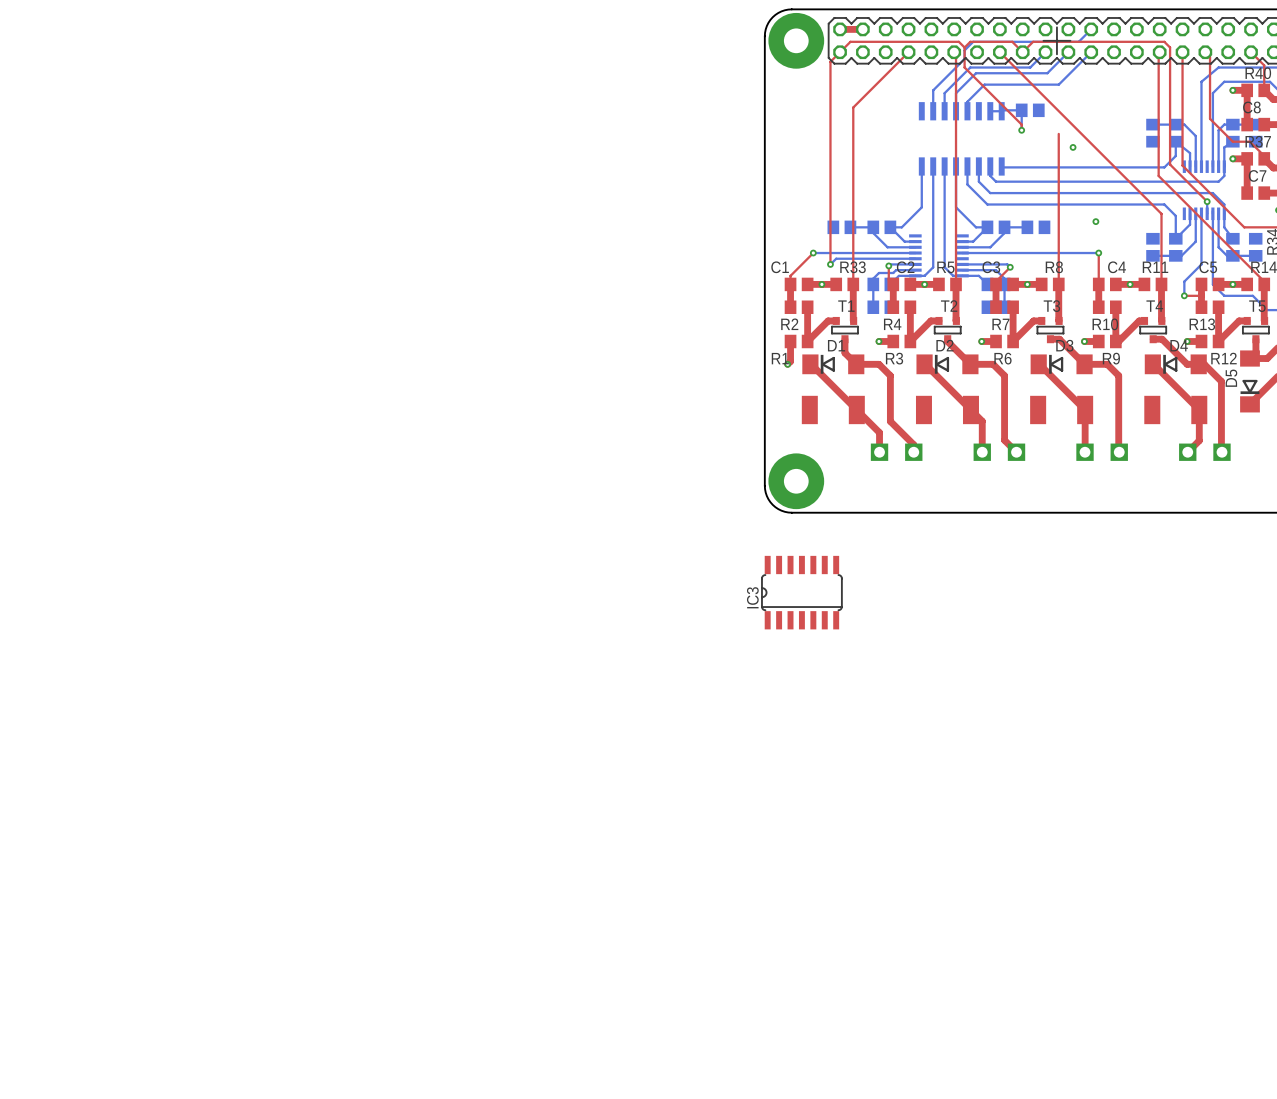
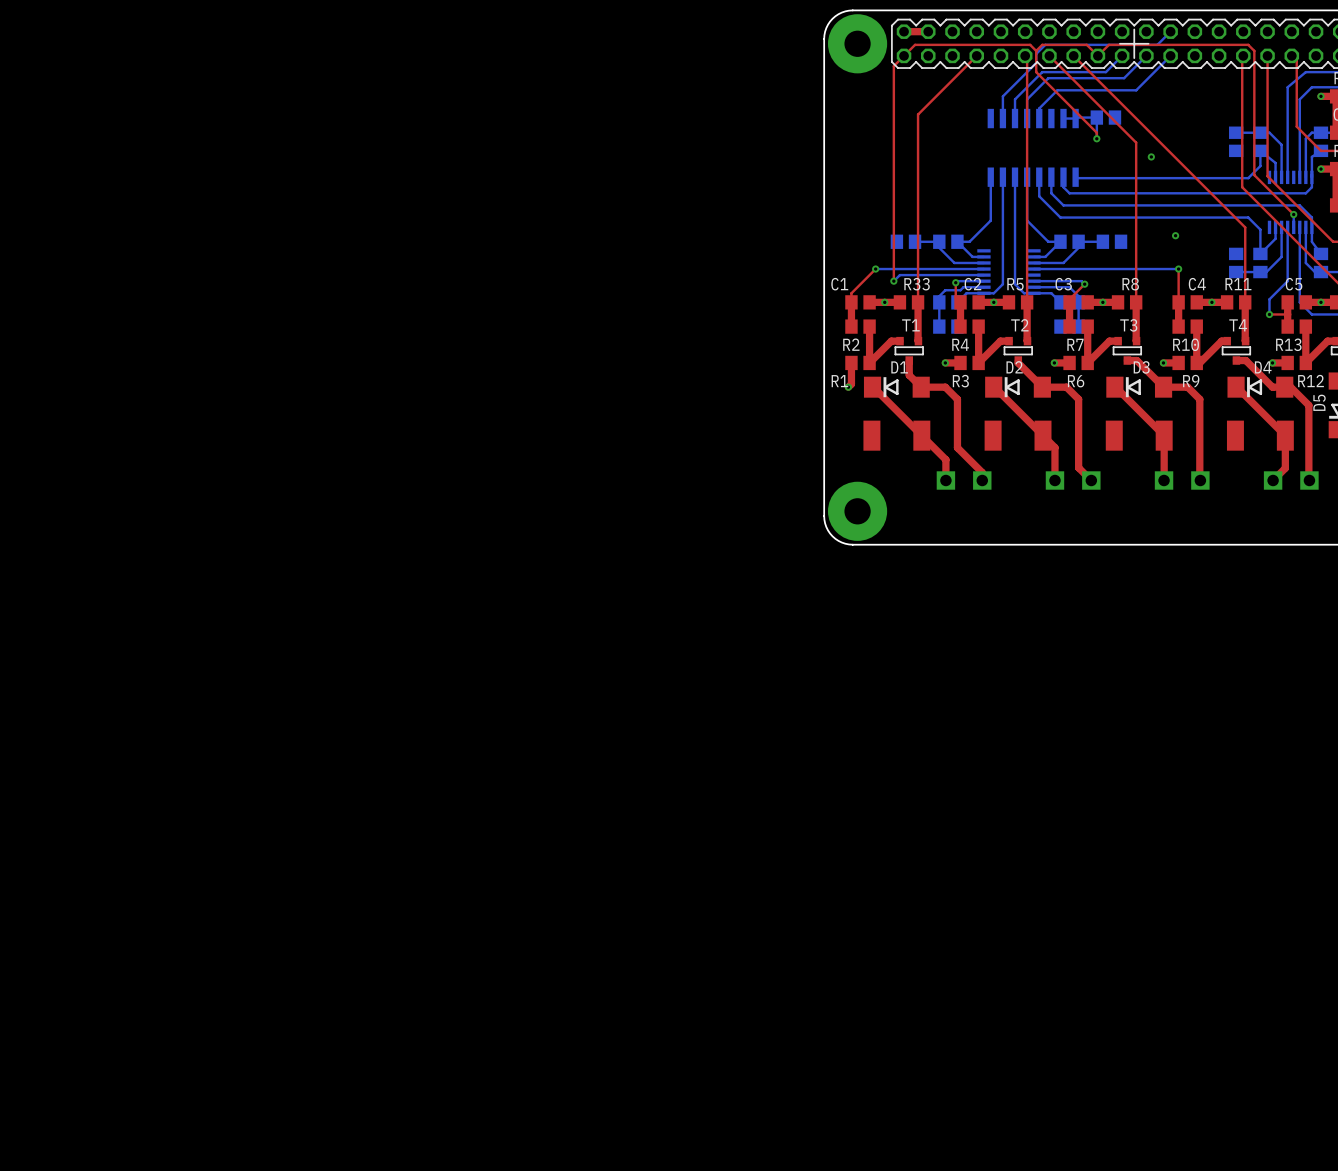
top track: none -> (1049, 55) (1136, 142)
IC3: (801, 592) -> none

